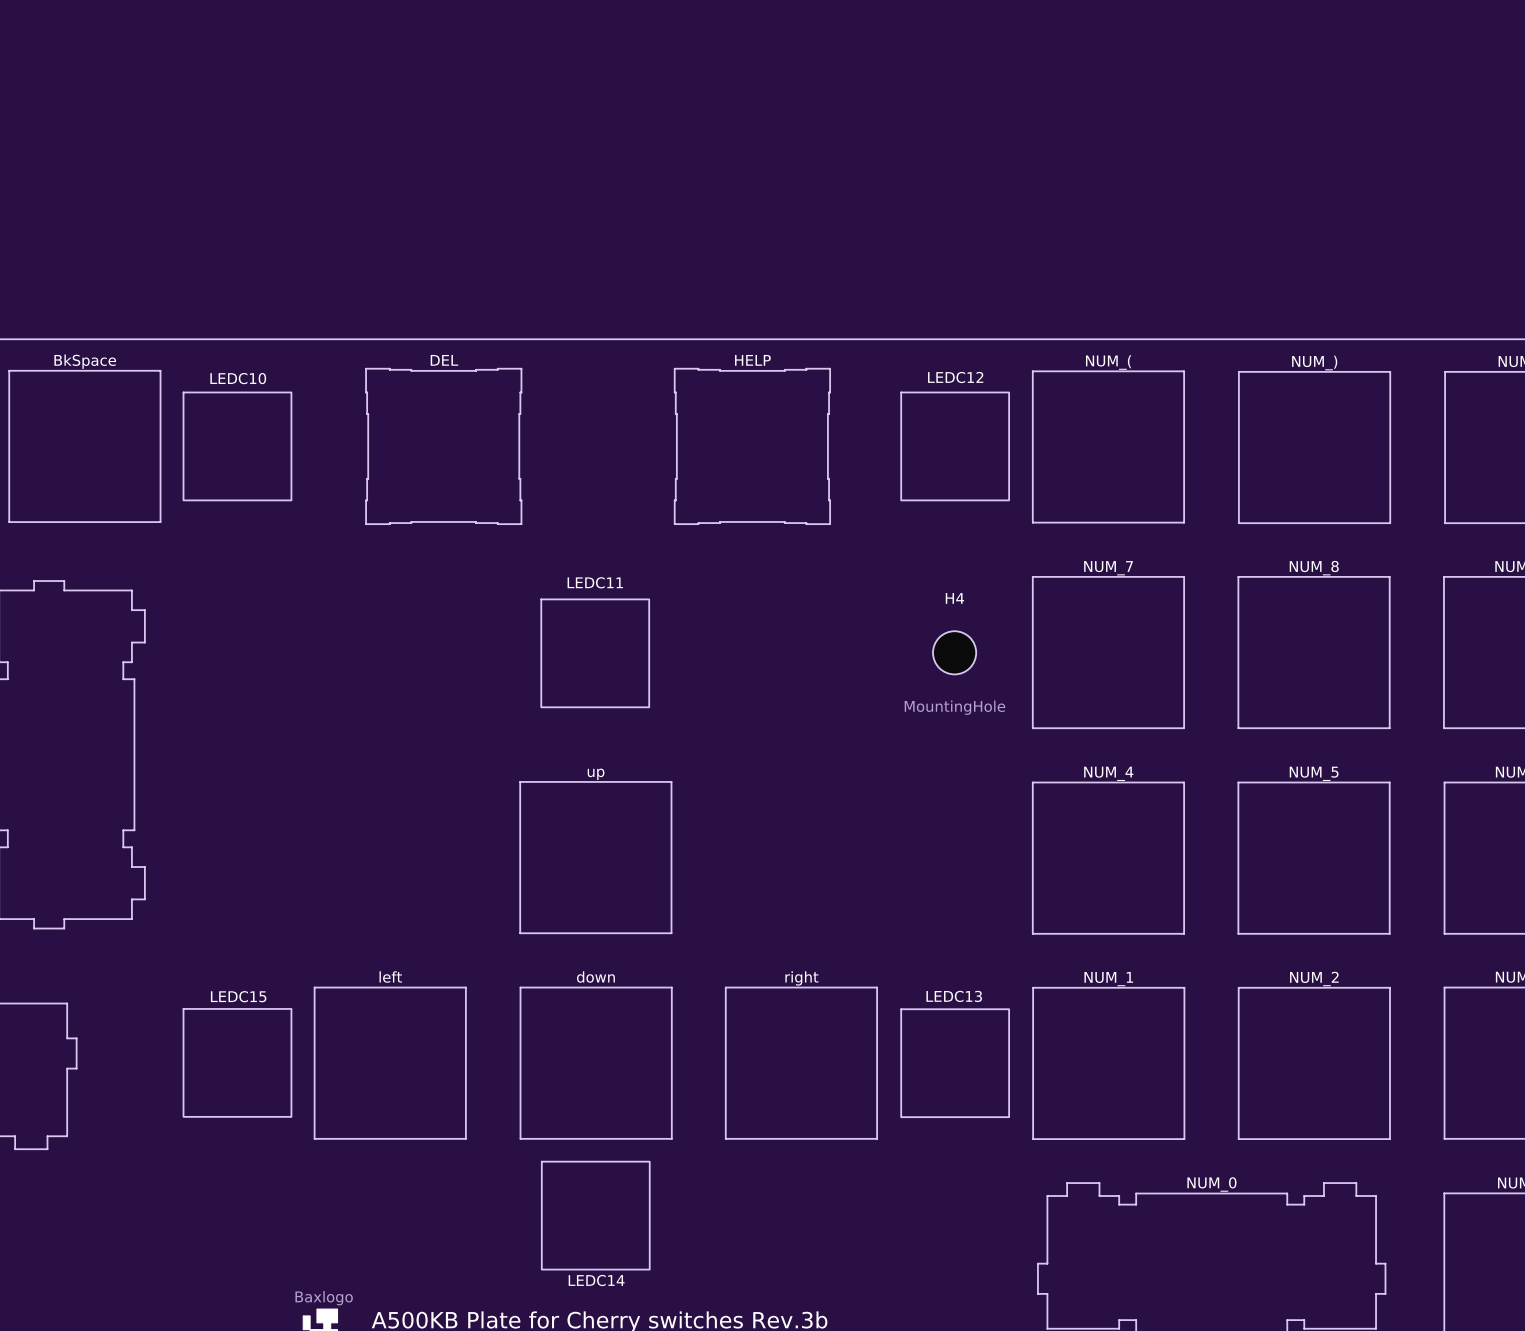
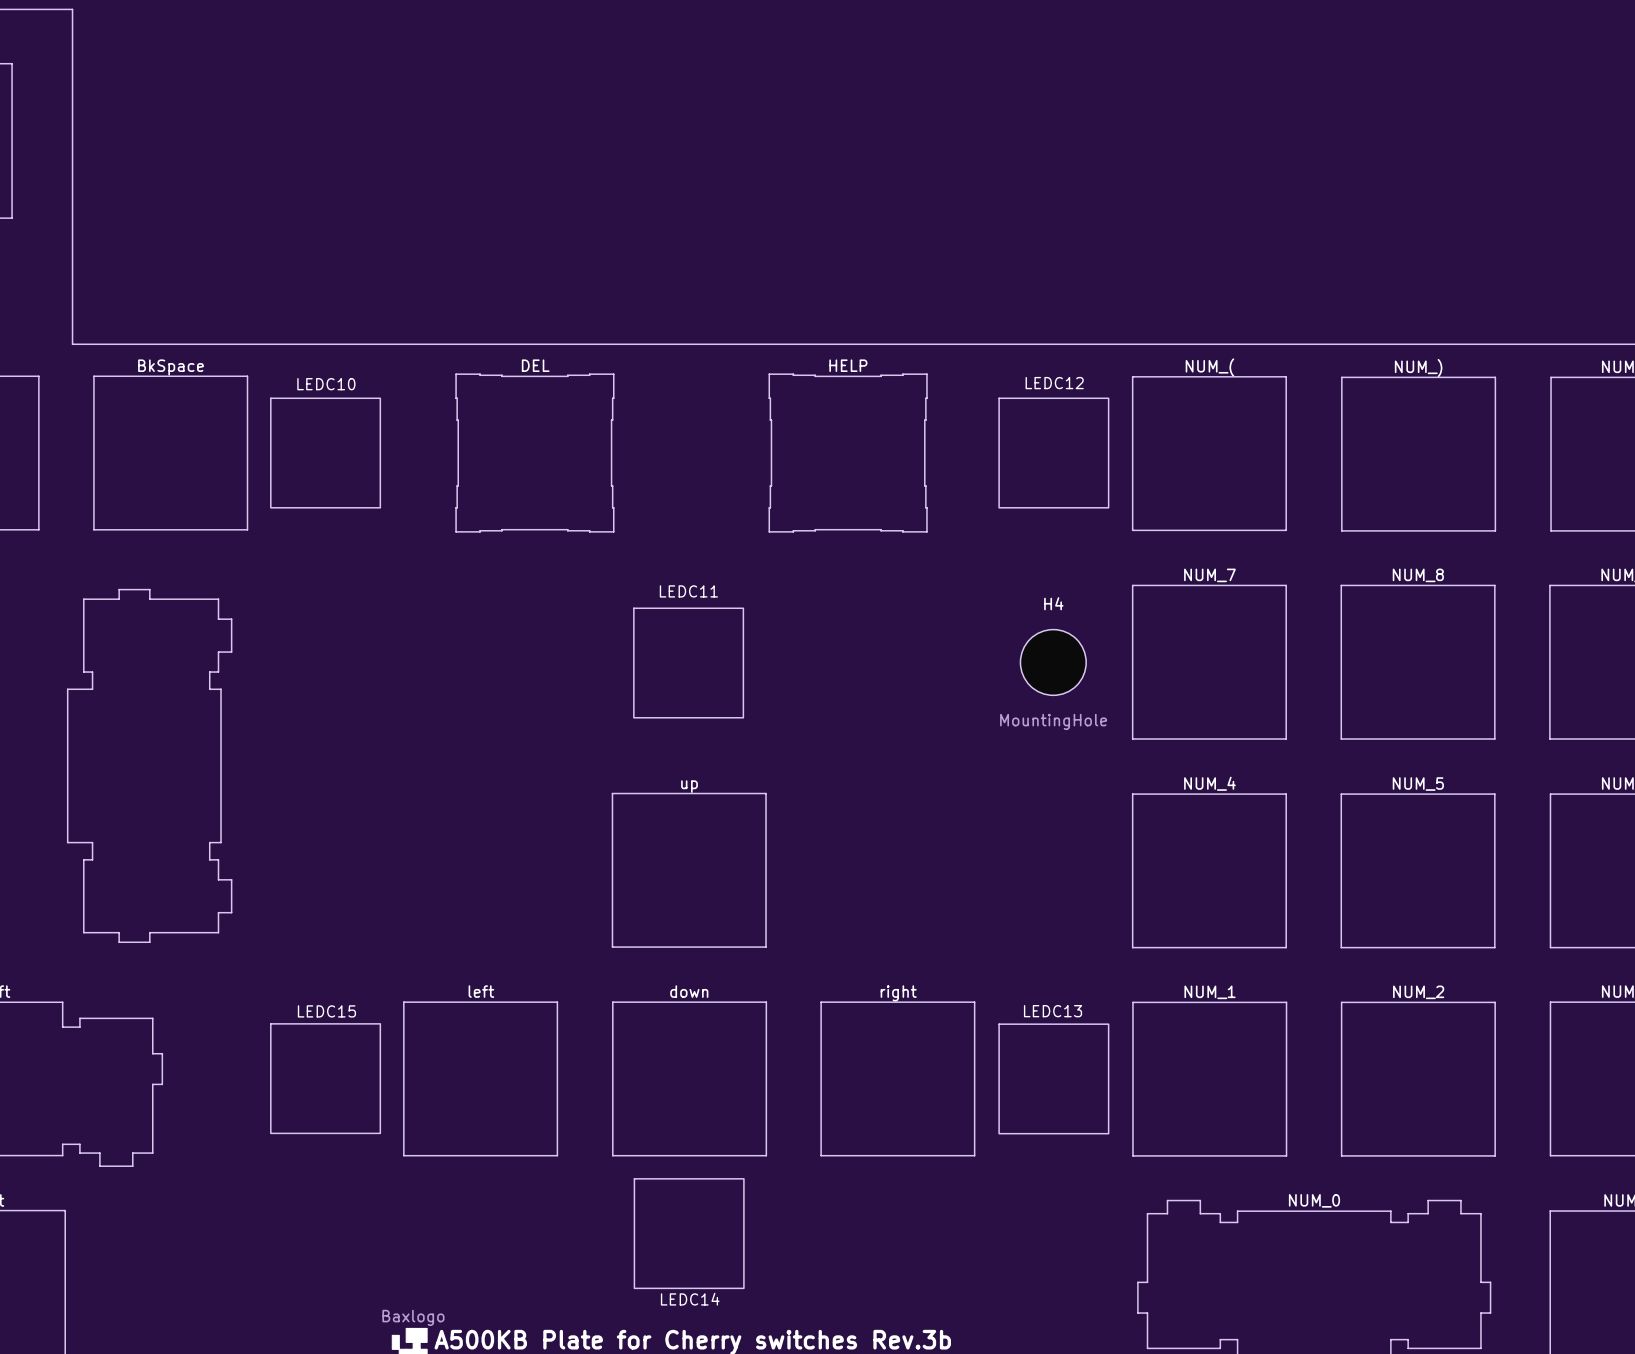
H4 footprint: [933, 631, 977, 675] -> [1020, 629, 1087, 696]

